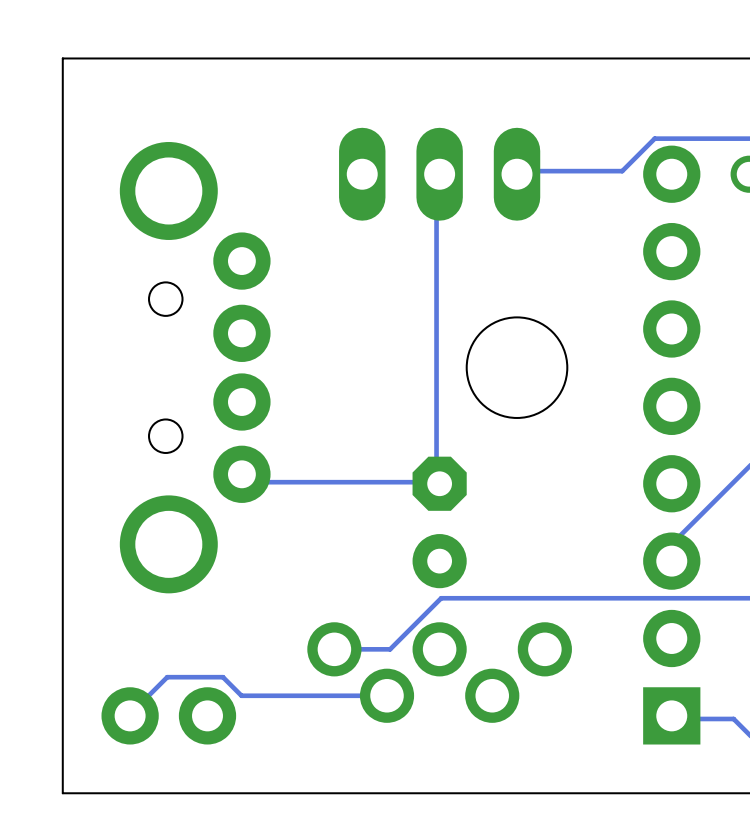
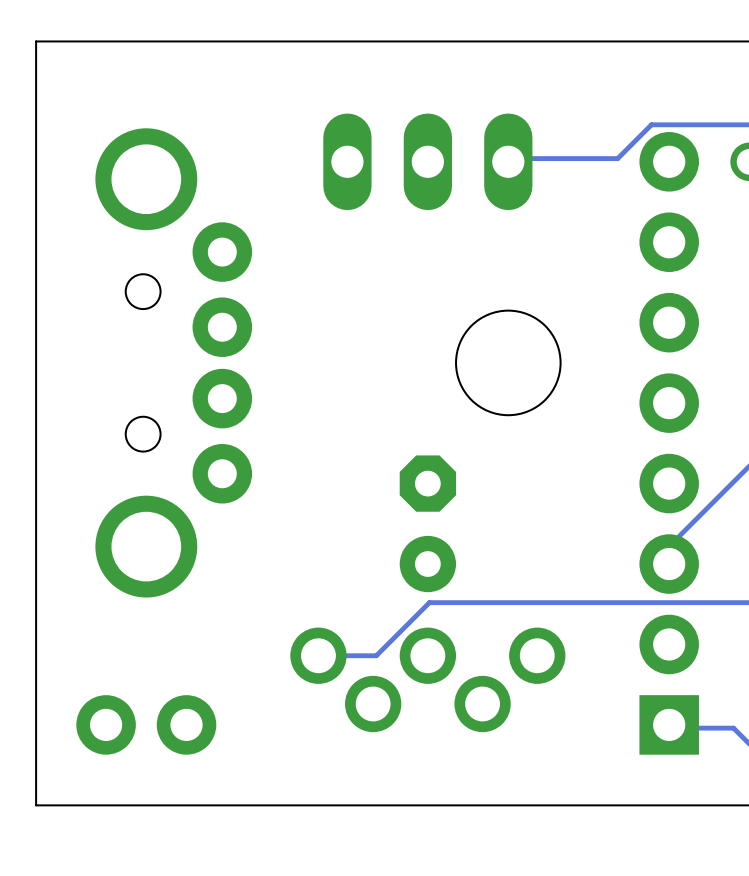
track: (439, 174) (436, 175) (436, 482) -> none
track: (241, 474) (250, 482) (436, 482) -> none
track: (387, 695) (241, 695) (222, 677) (167, 677) (130, 715) -> none

